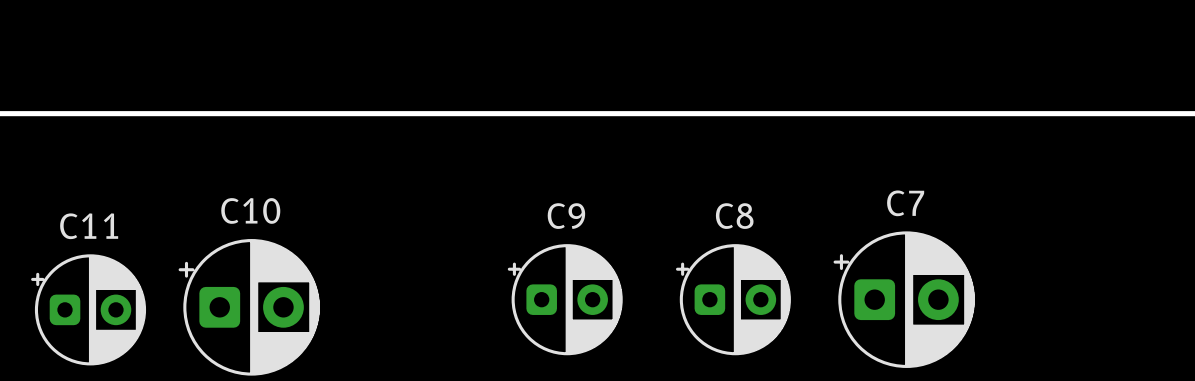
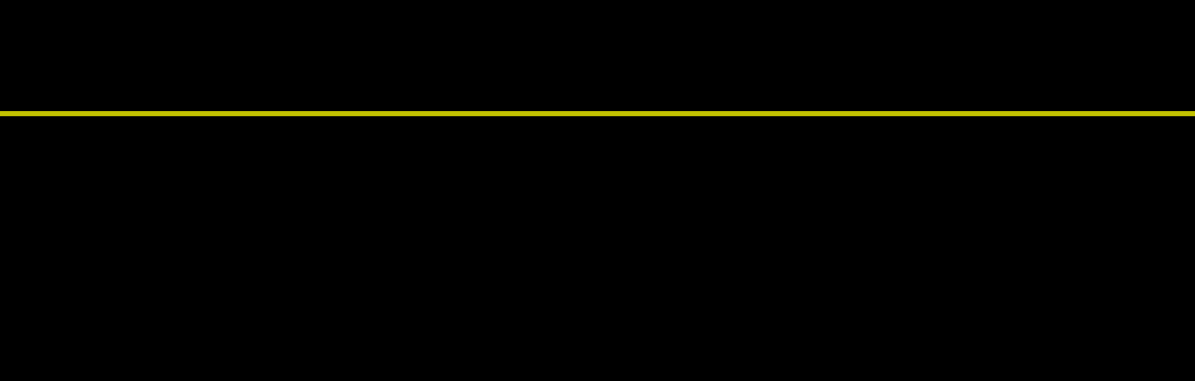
C9: (565, 299) -> none
C8: (733, 299) -> none
C7: (904, 299) -> none
C10: (249, 307) -> none
C11: (88, 309) -> none

